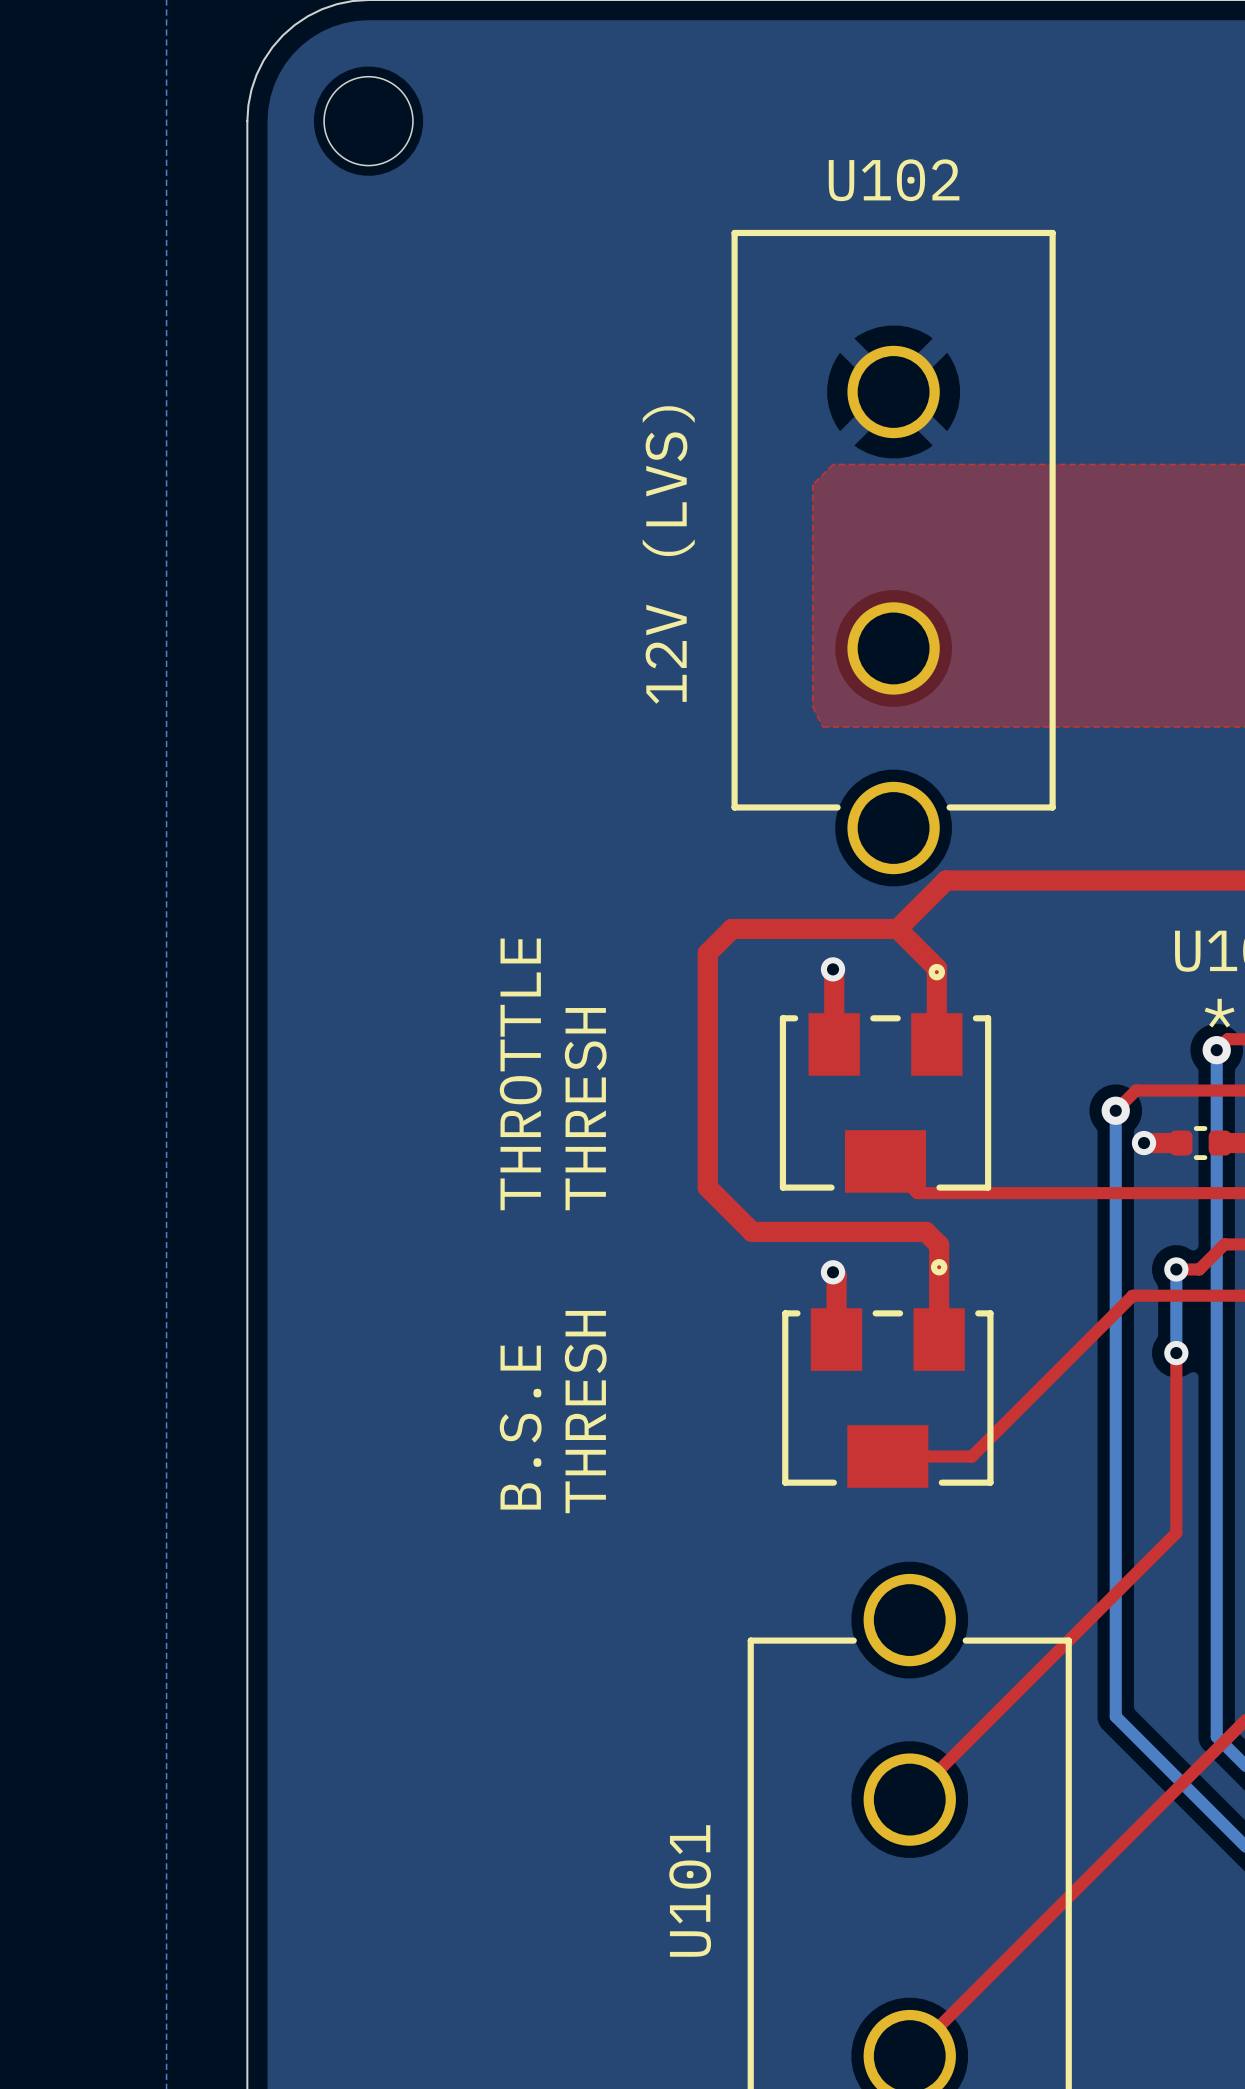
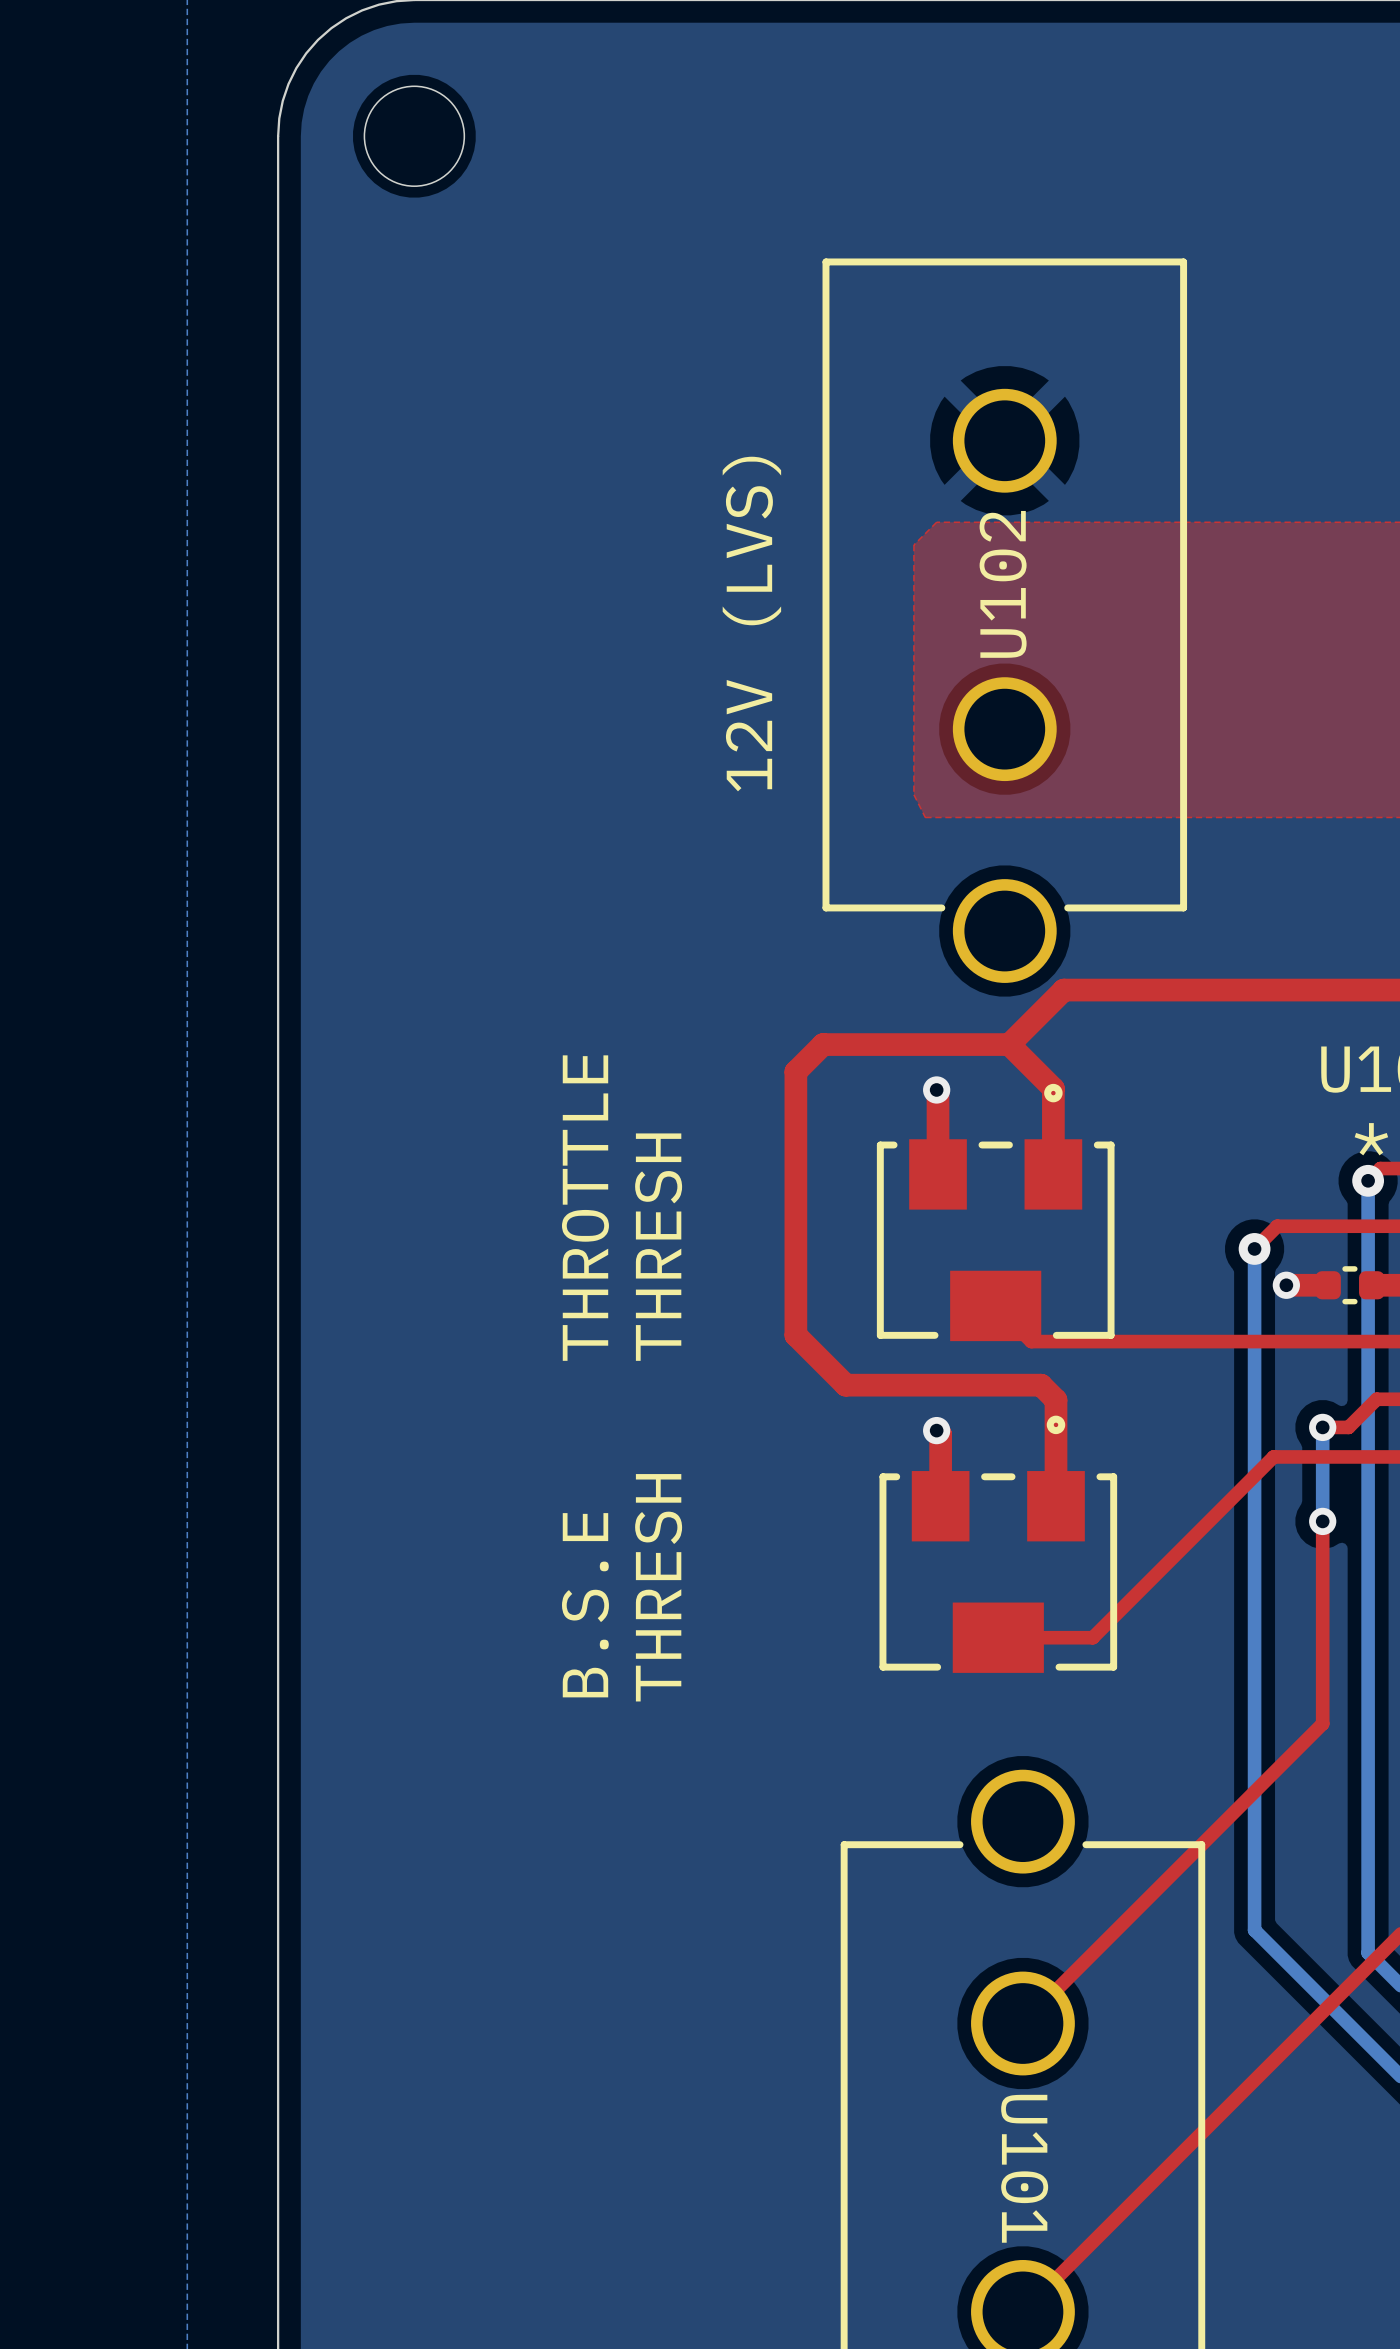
U102 name rotation: 0° (894, 180) -> 90° counterclockwise (1003, 584)
U102 name position: U102 (894, 180) -> U102 (1003, 584)
U101 name rotation: 0° (690, 1890) -> 180° (1024, 2168)
U101 name position: U101 (690, 1890) -> U101 (1024, 2168)

